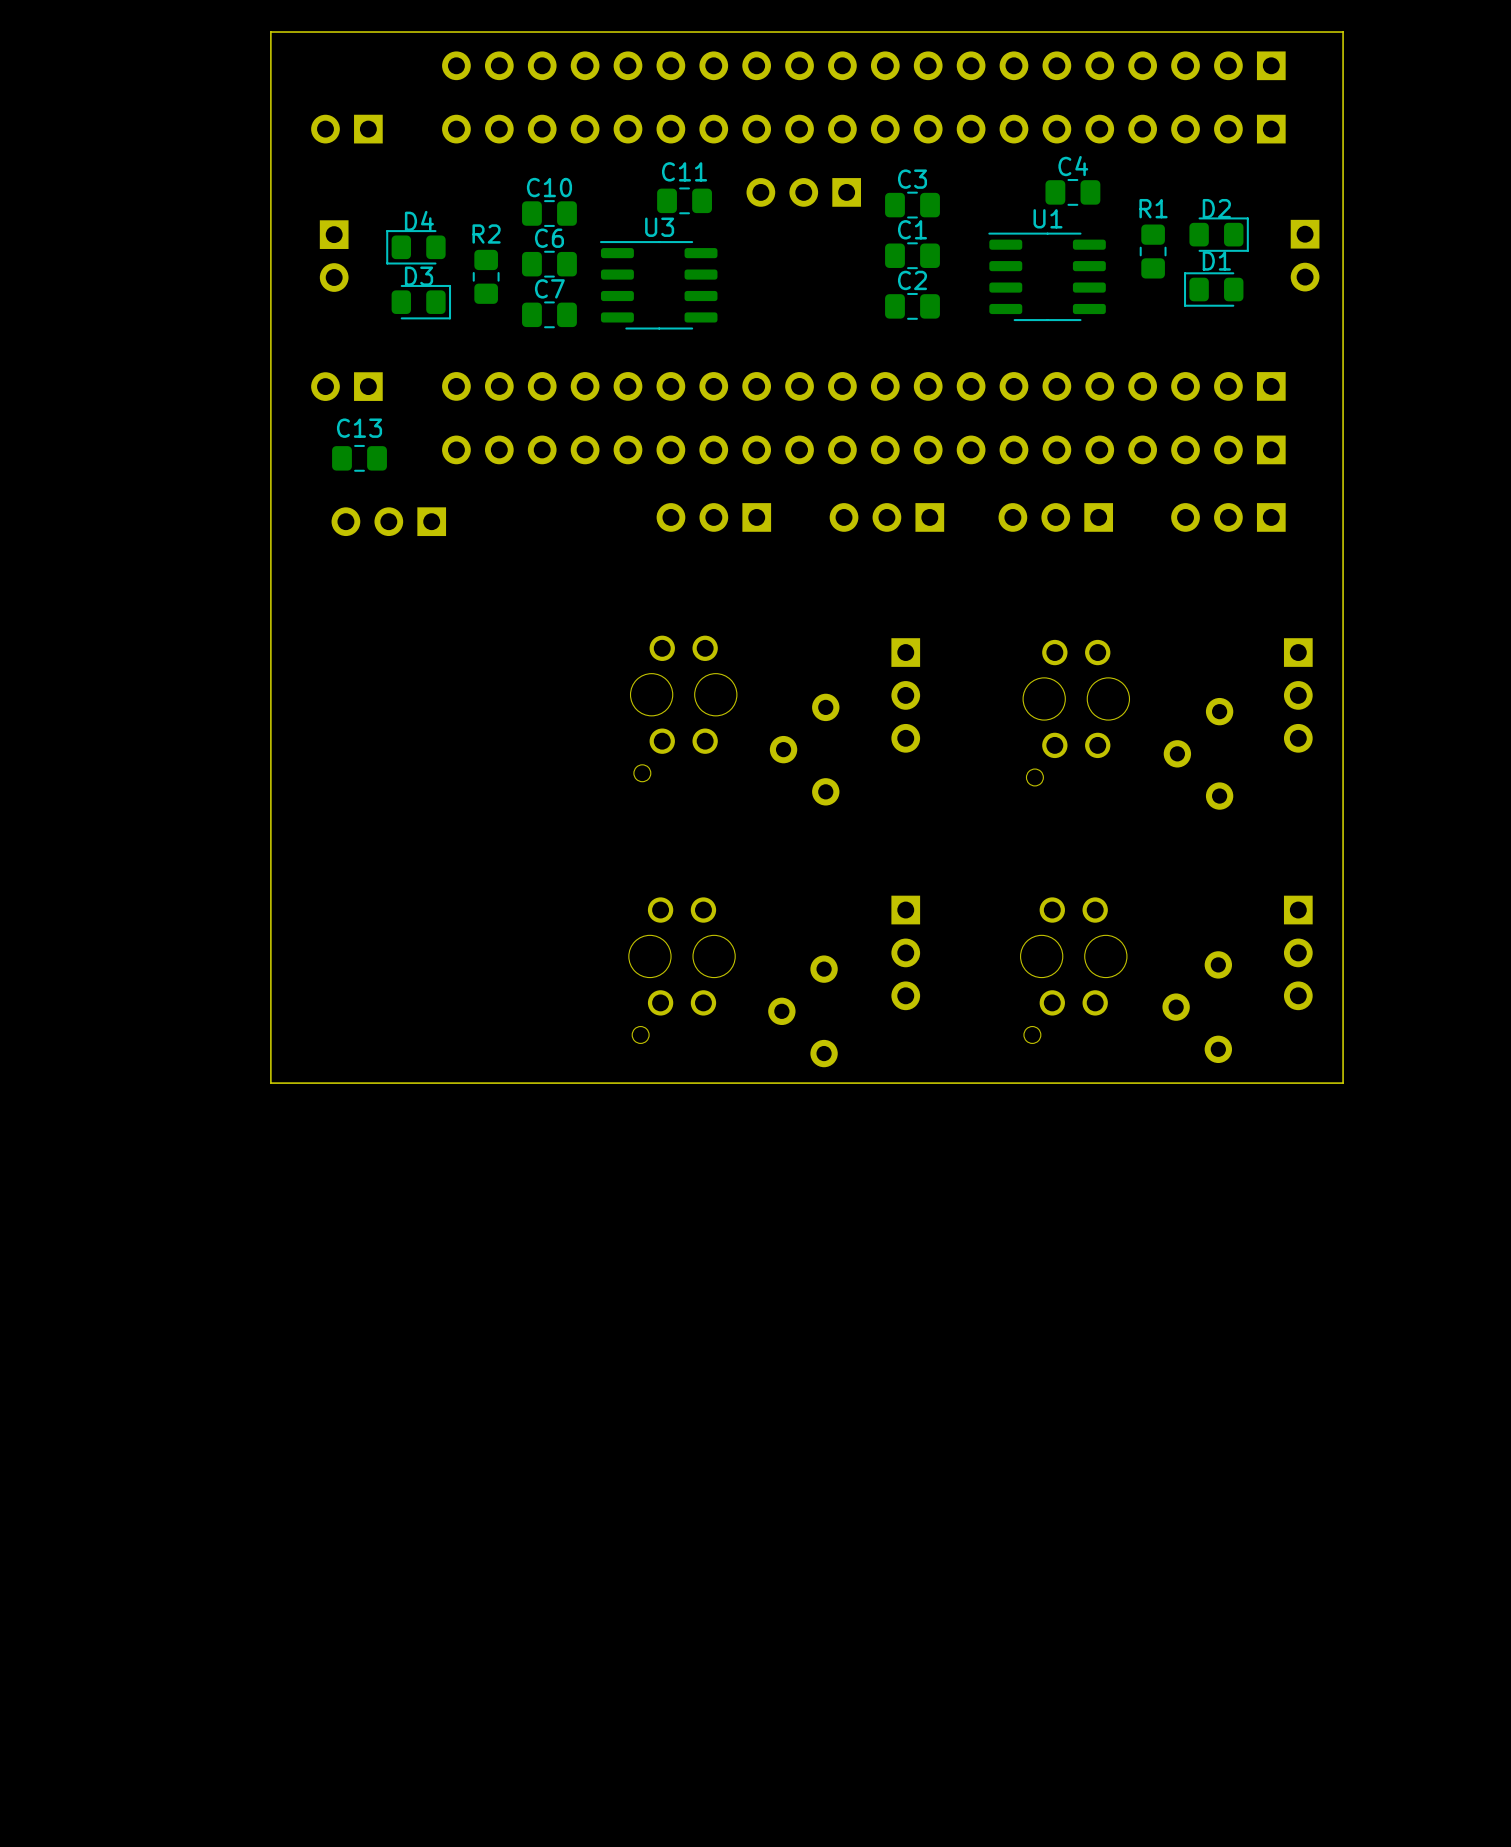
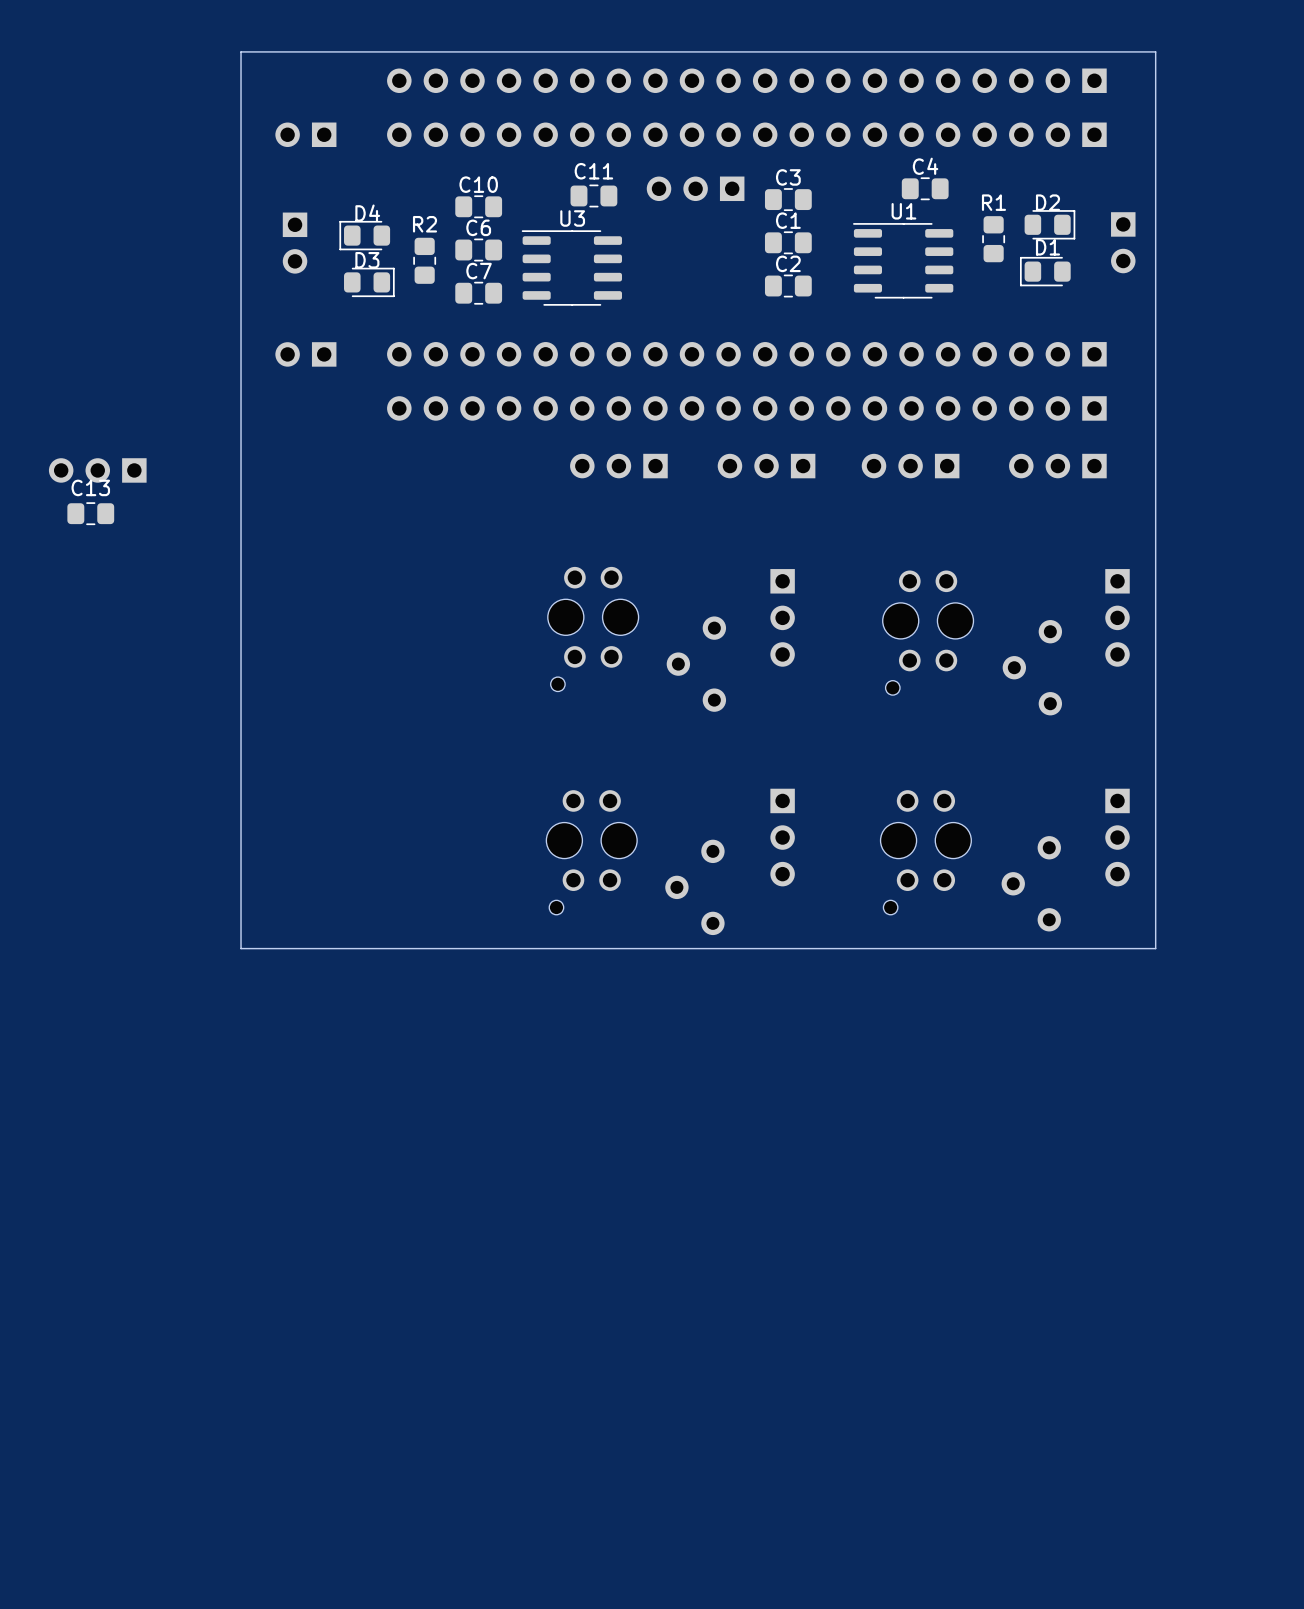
C13 position: (359, 458) -> (90, 513)
part position: (388, 521) -> (97, 470)

